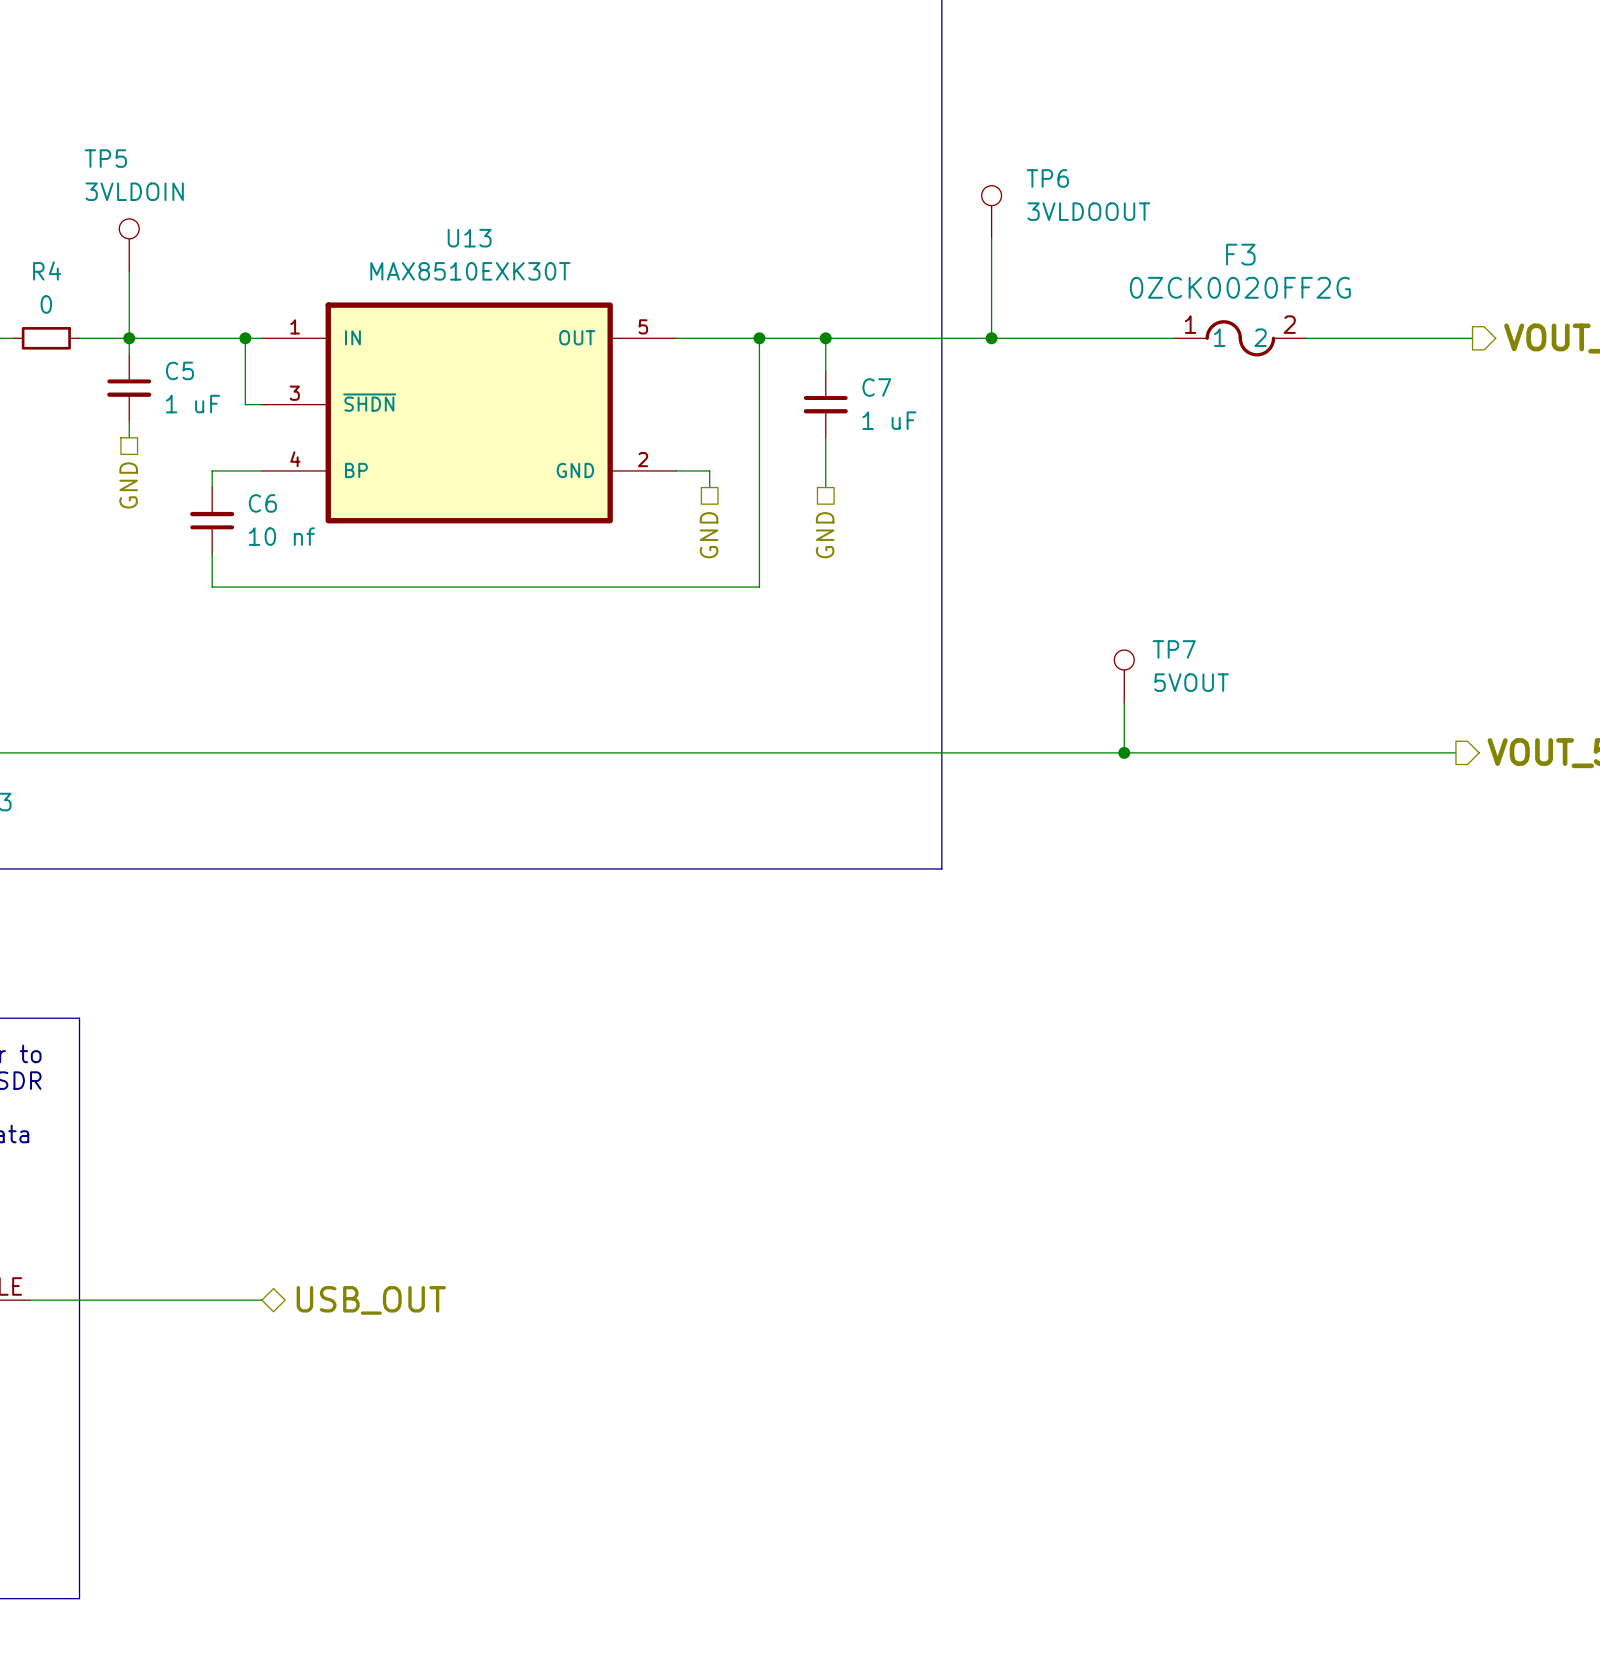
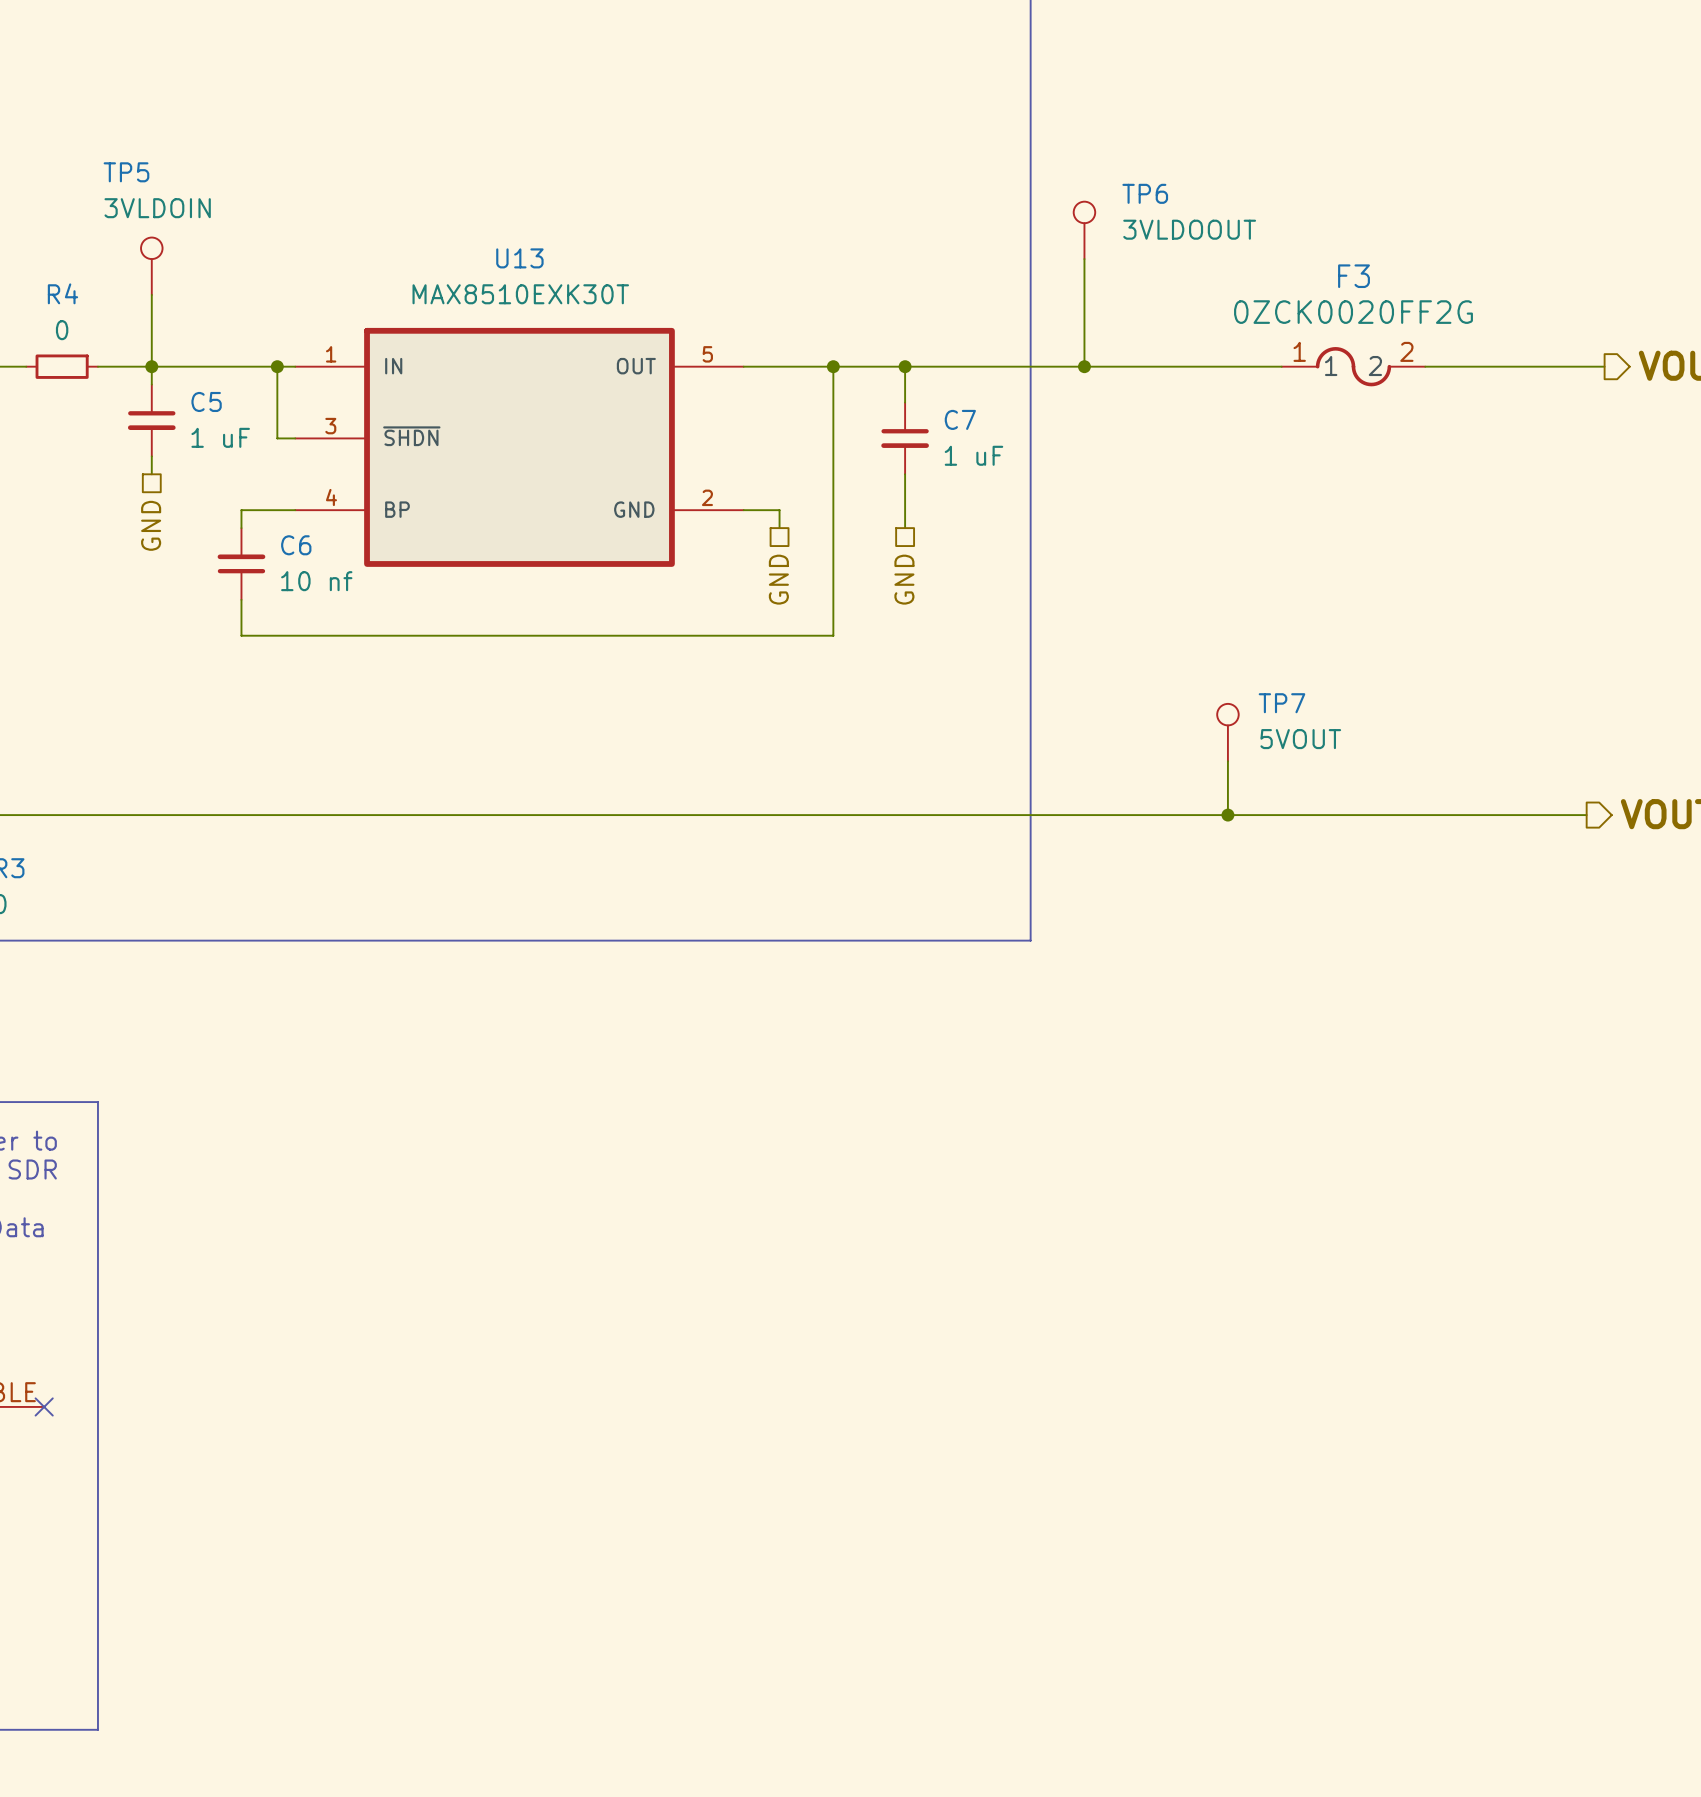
wire: (29, 1300) (261, 1300) -> none
no-connect mark: none -> (44, 1406)
hierarchical label: USB_OUT (371, 1300) -> none

